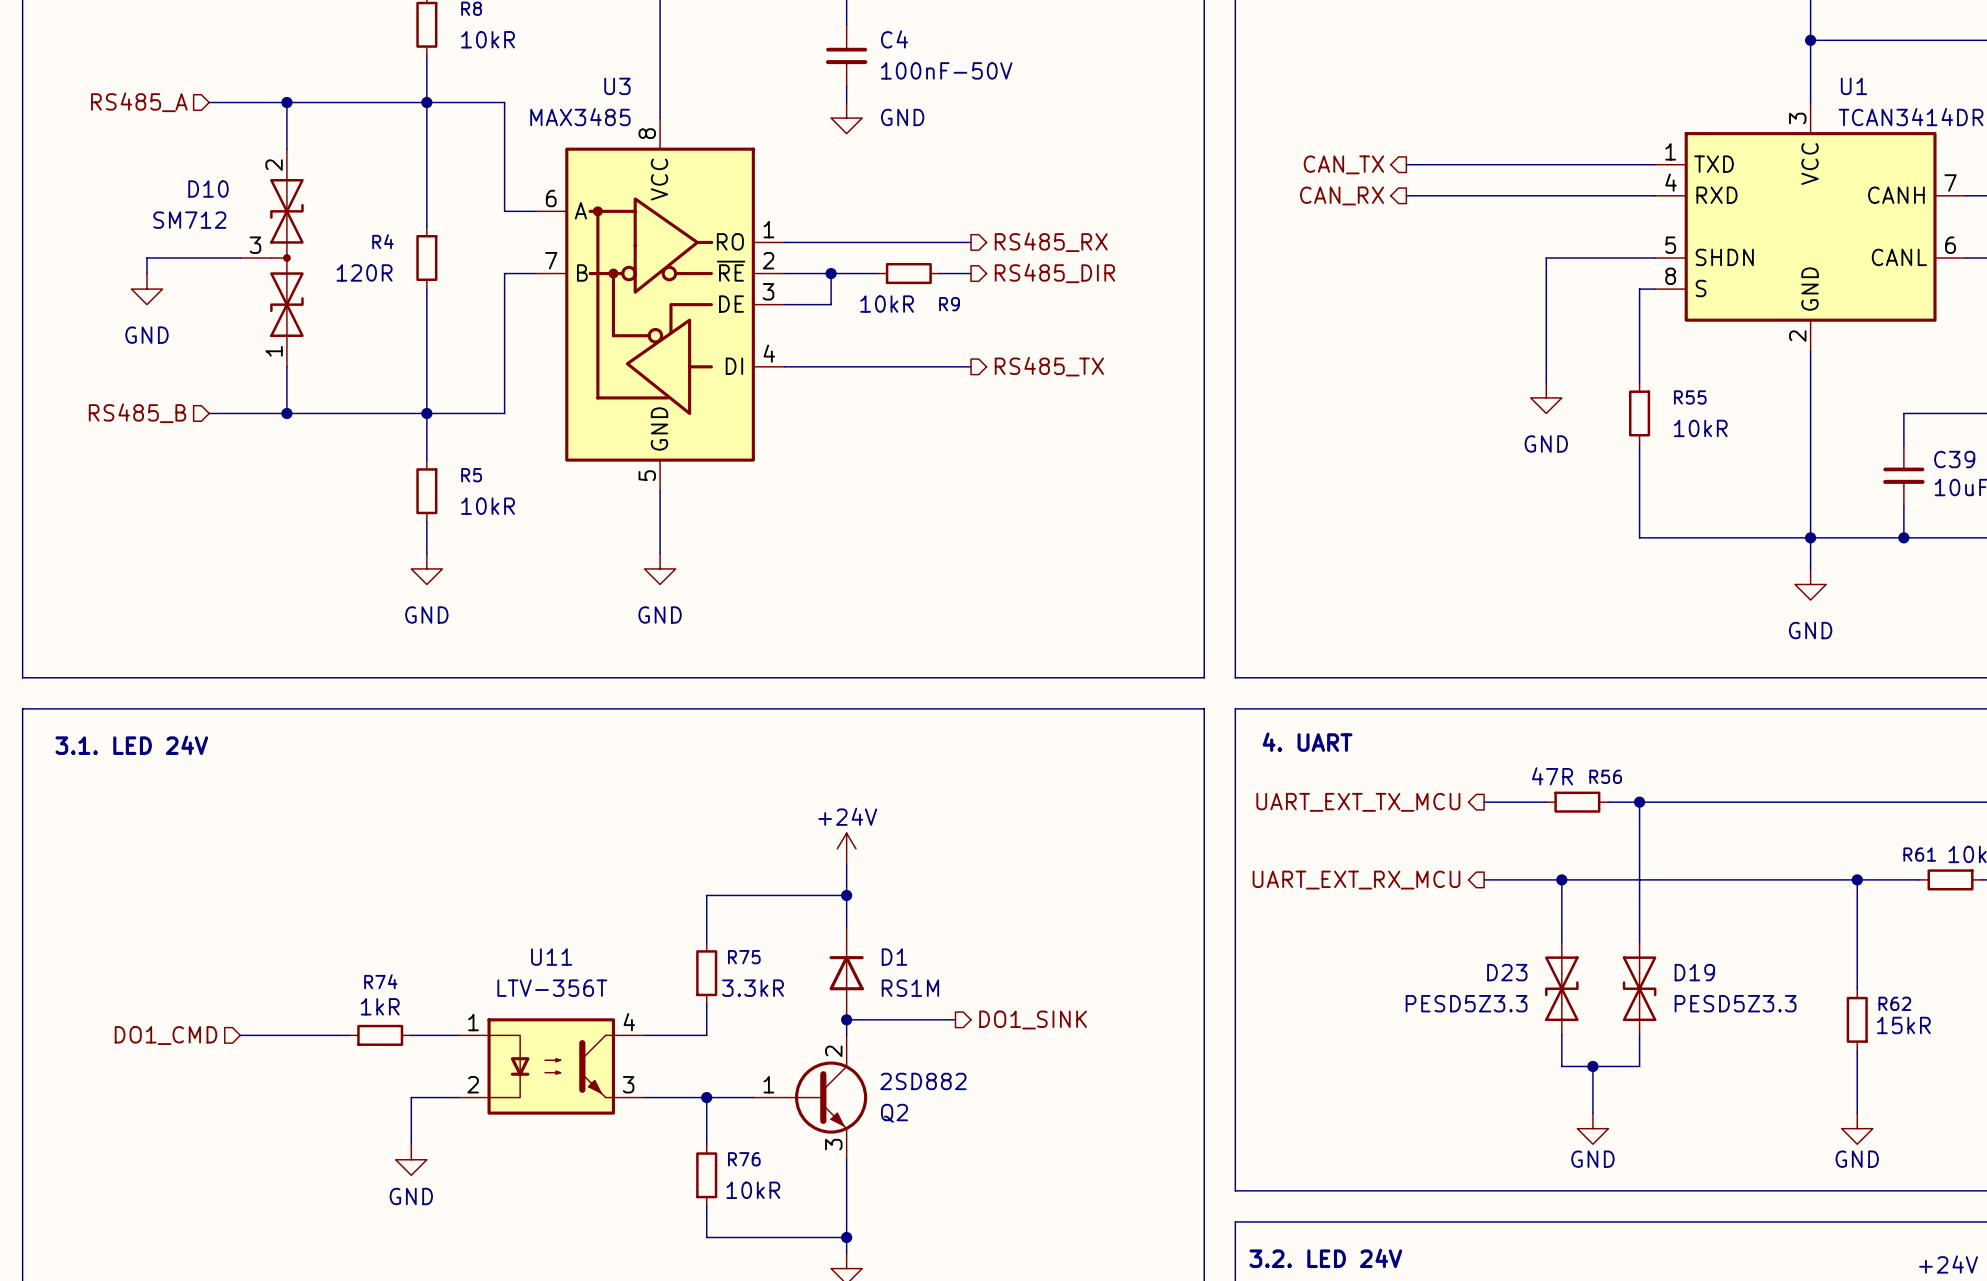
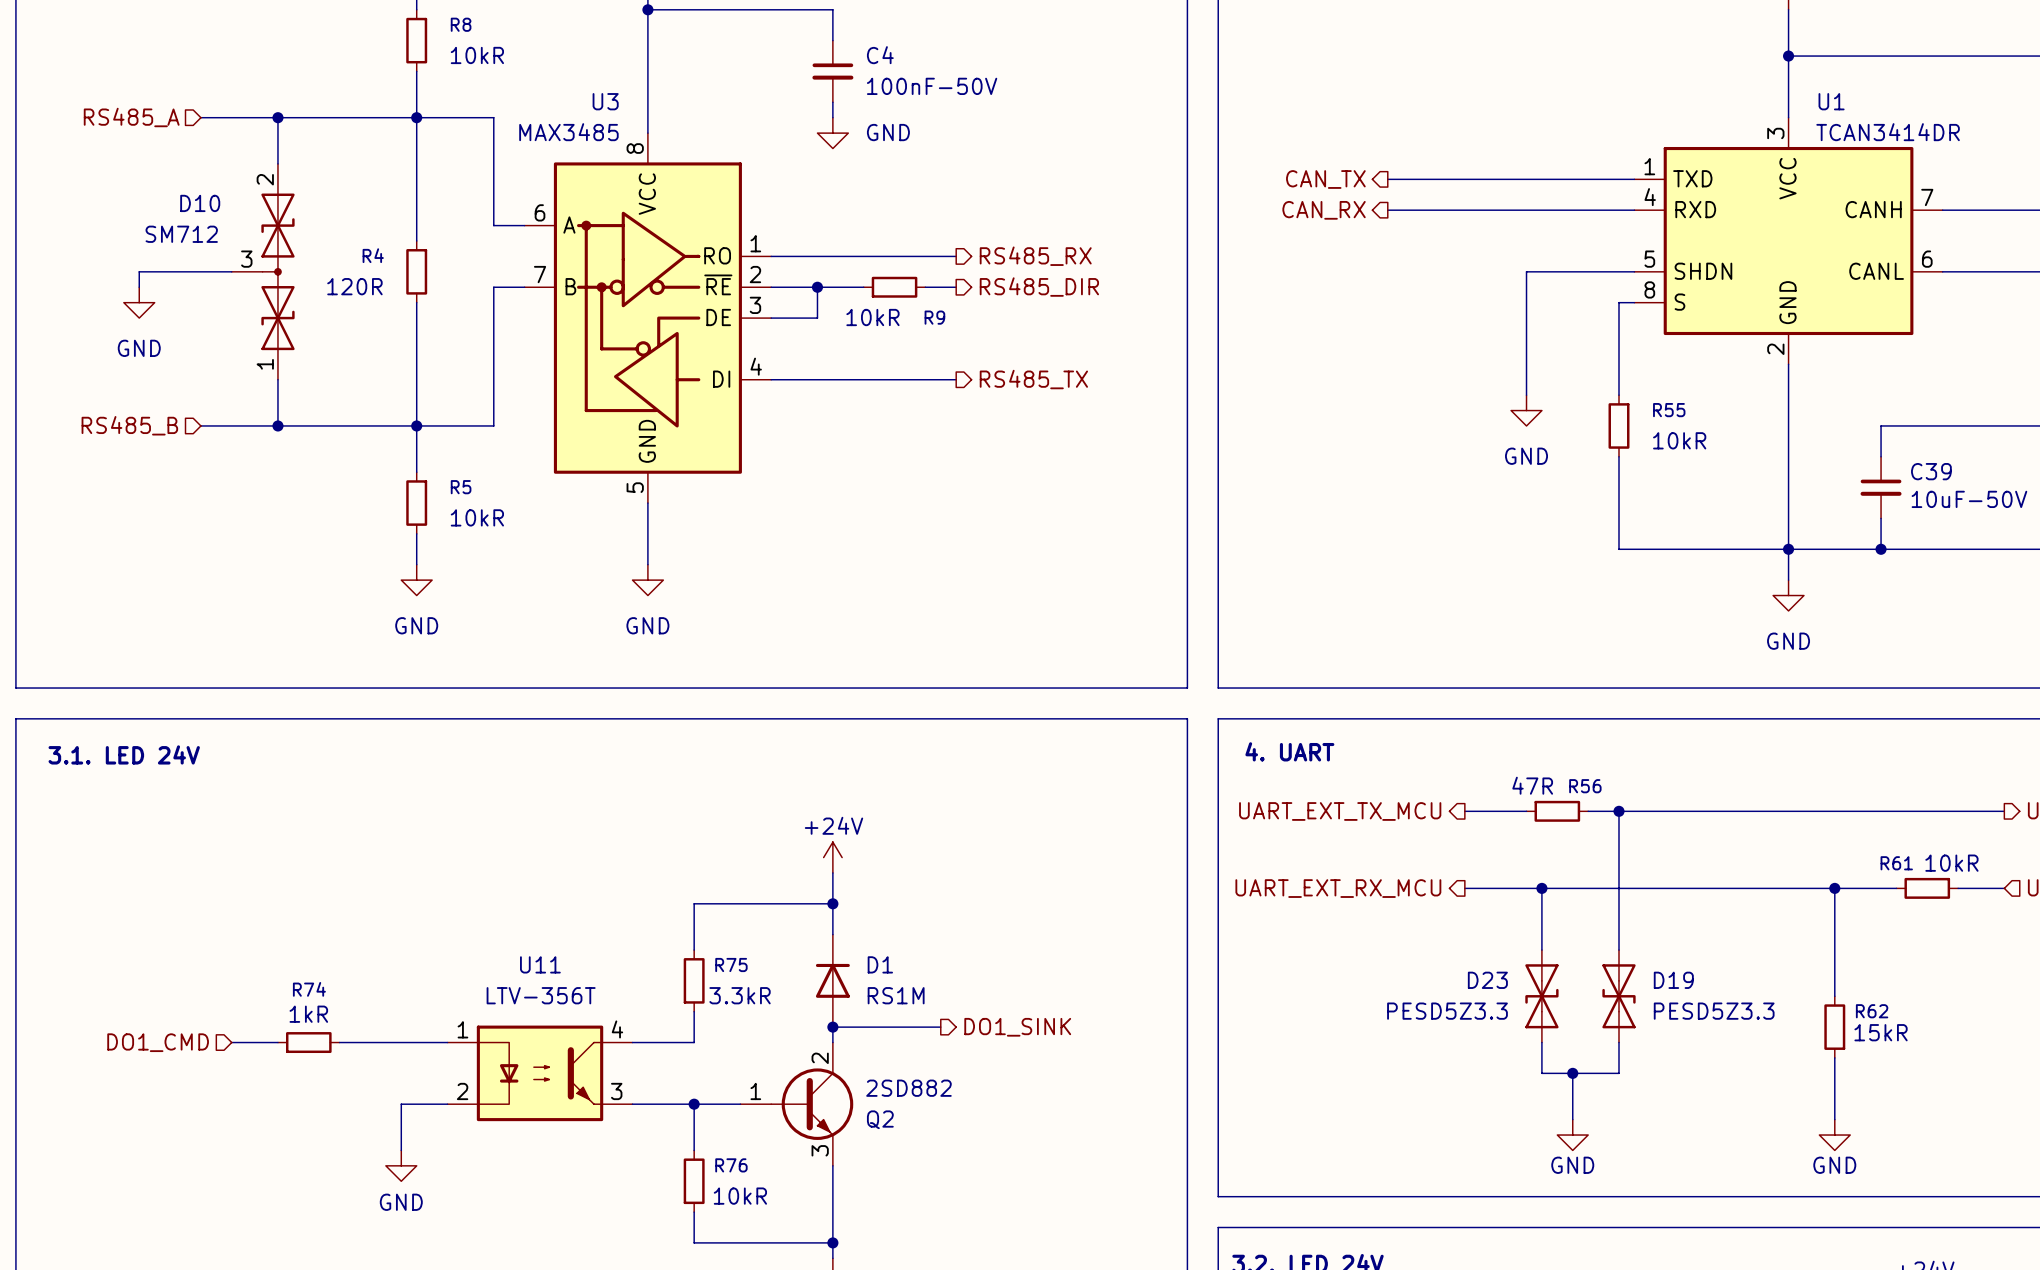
wire: (286, 1035) (349, 1035) -> (401, 1042) (339, 1042)
R74 position: (380, 1035) -> (308, 1042)

